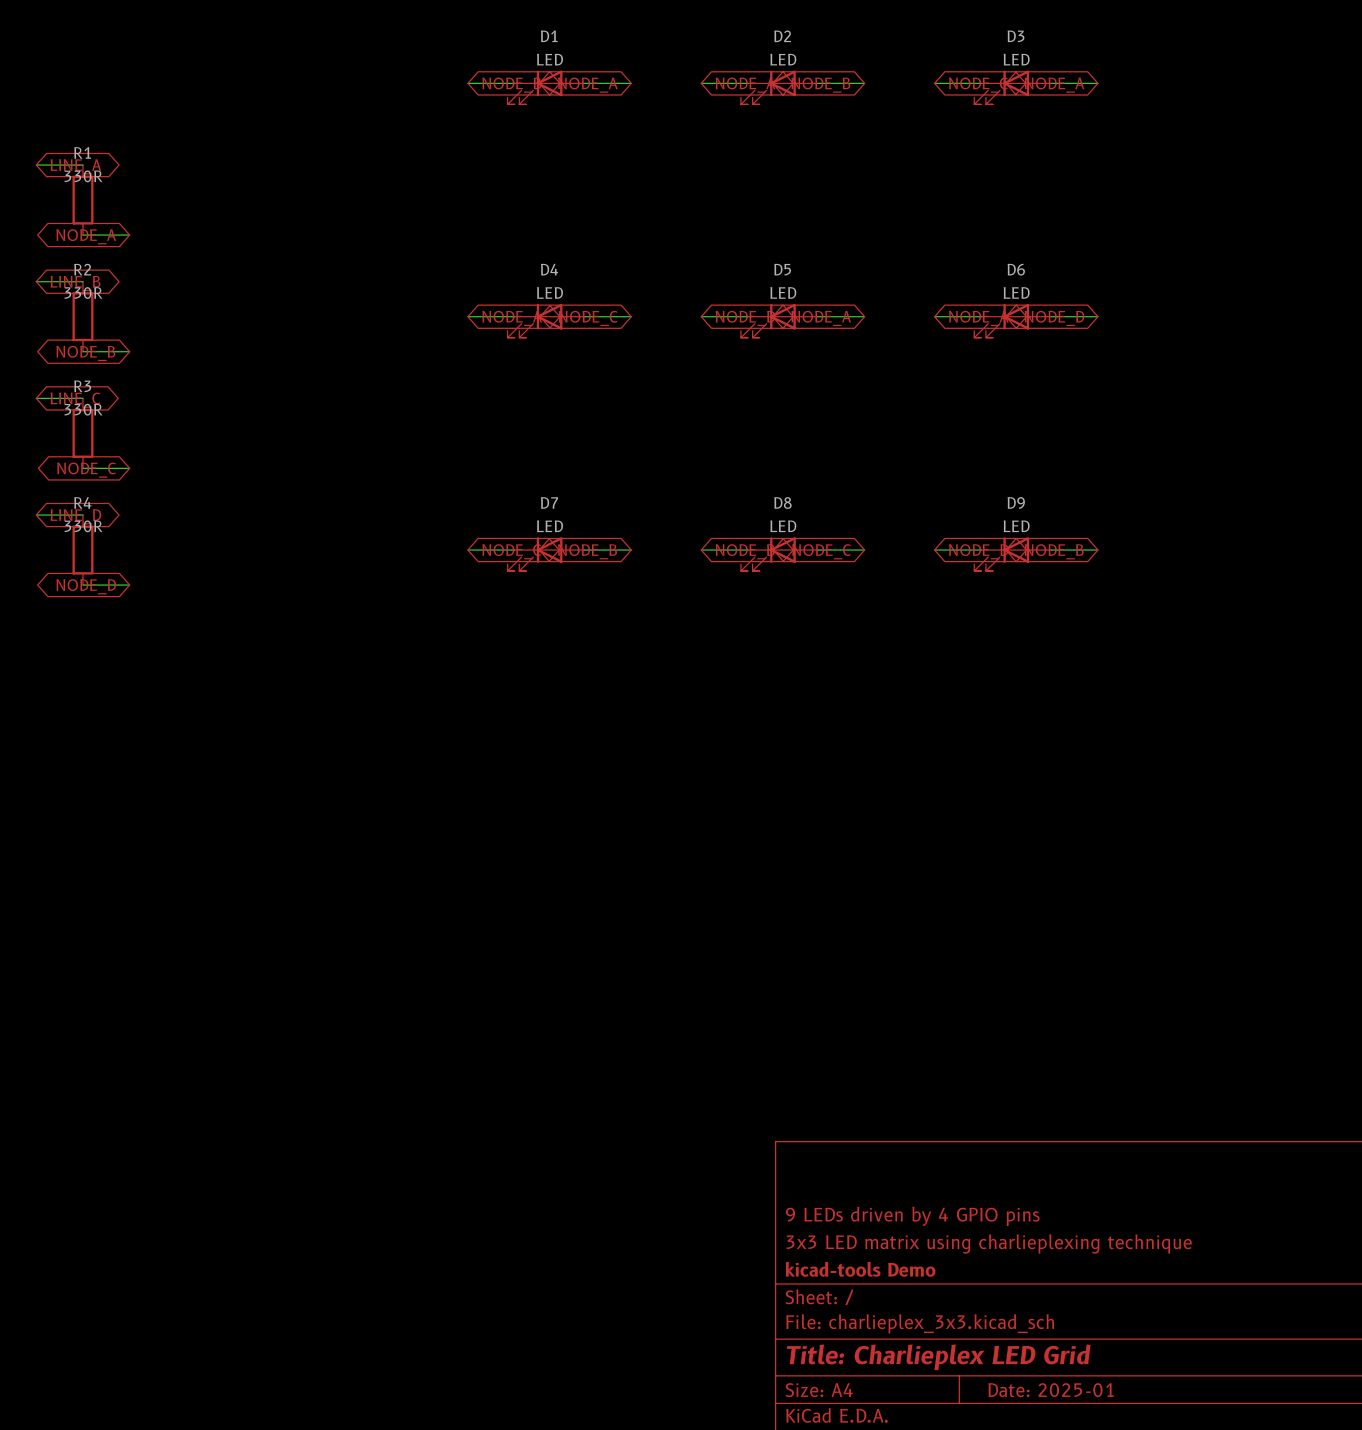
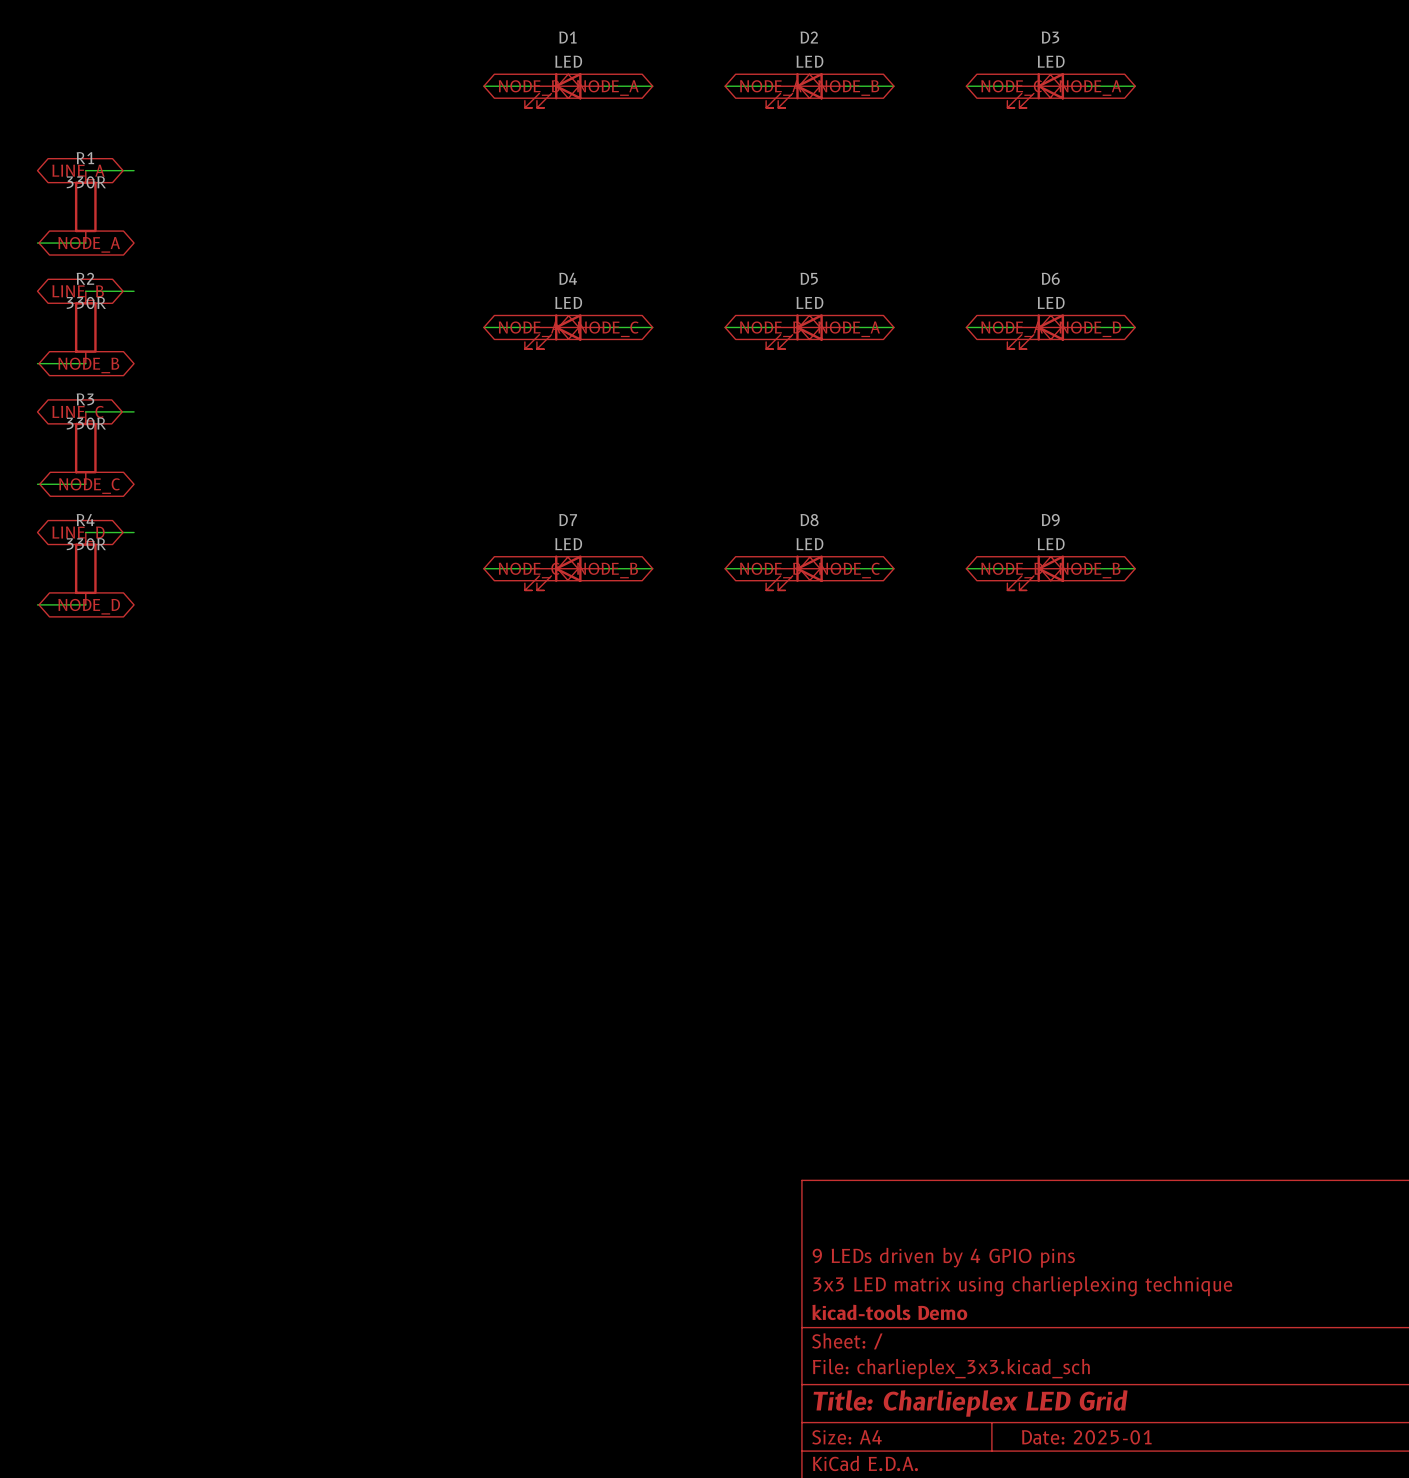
wire: (36, 165) (82, 165) -> (134, 170) (85, 170)
wire: (82, 235) (129, 235) -> (85, 243) (37, 243)
wire: (36, 281) (82, 281) -> (134, 291) (85, 291)
wire: (82, 351) (129, 351) -> (85, 363) (37, 363)
wire: (36, 398) (82, 398) -> (134, 411) (85, 411)
wire: (82, 468) (129, 468) -> (85, 484) (37, 484)
wire: (36, 515) (82, 515) -> (134, 532) (85, 532)
wire: (82, 585) (129, 585) -> (85, 604) (37, 604)

